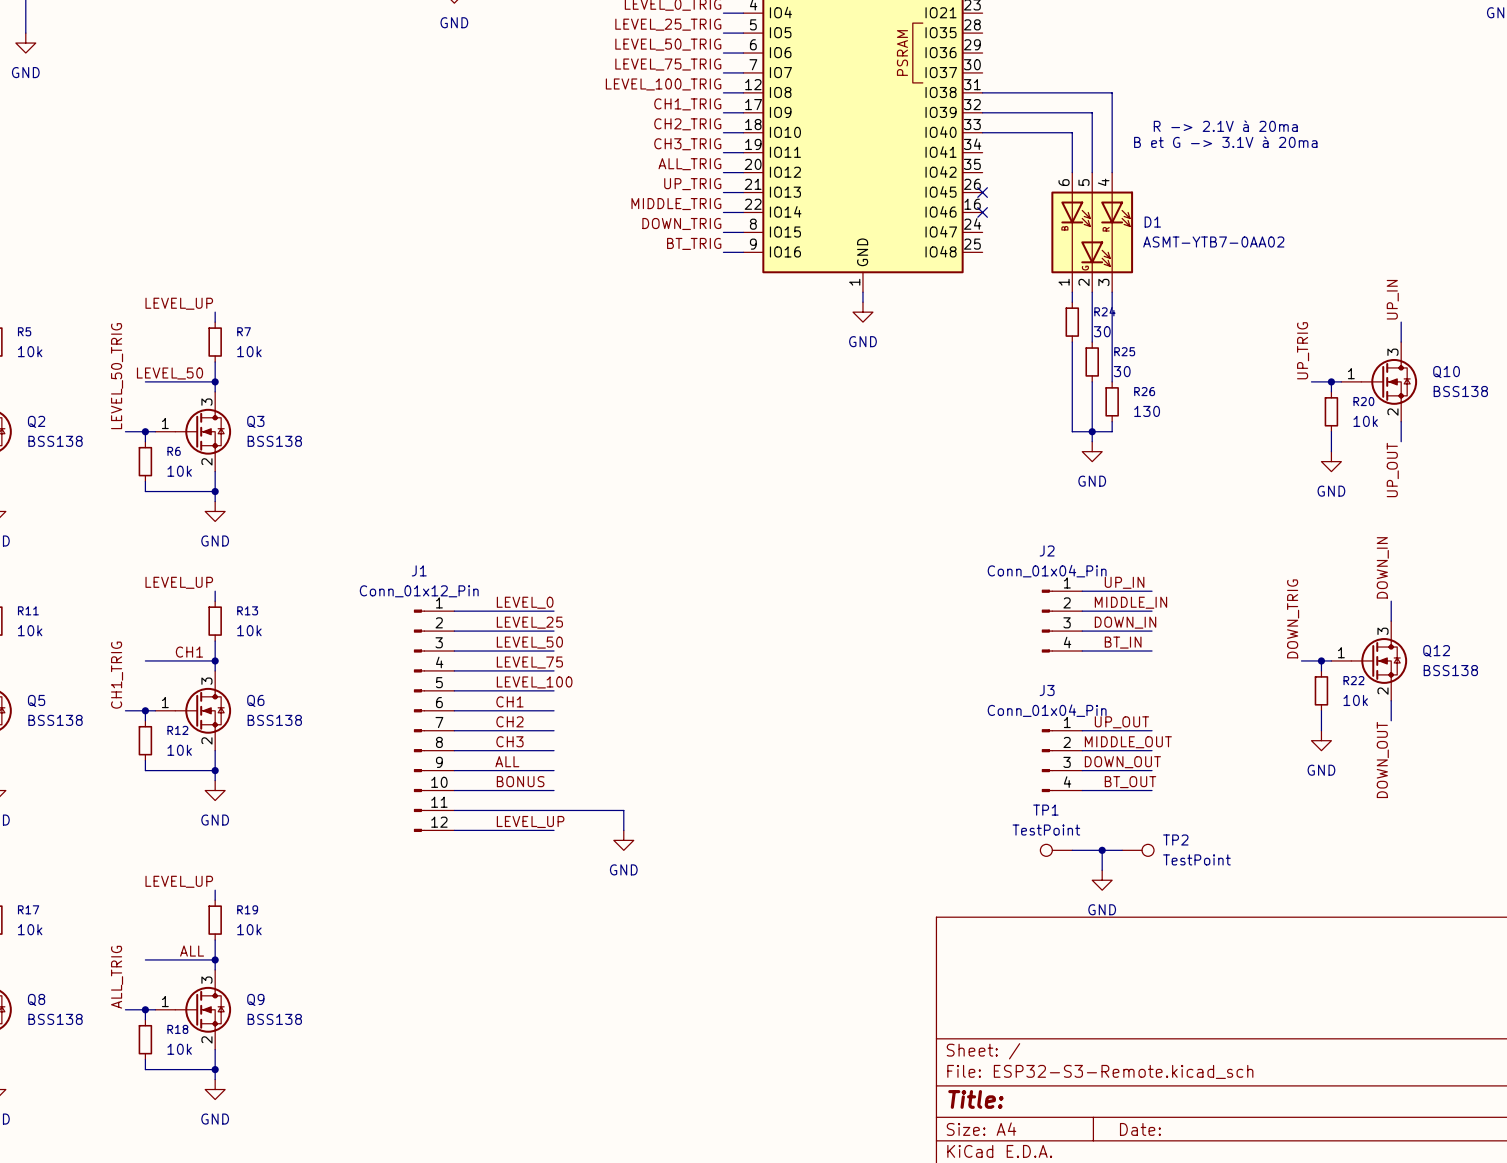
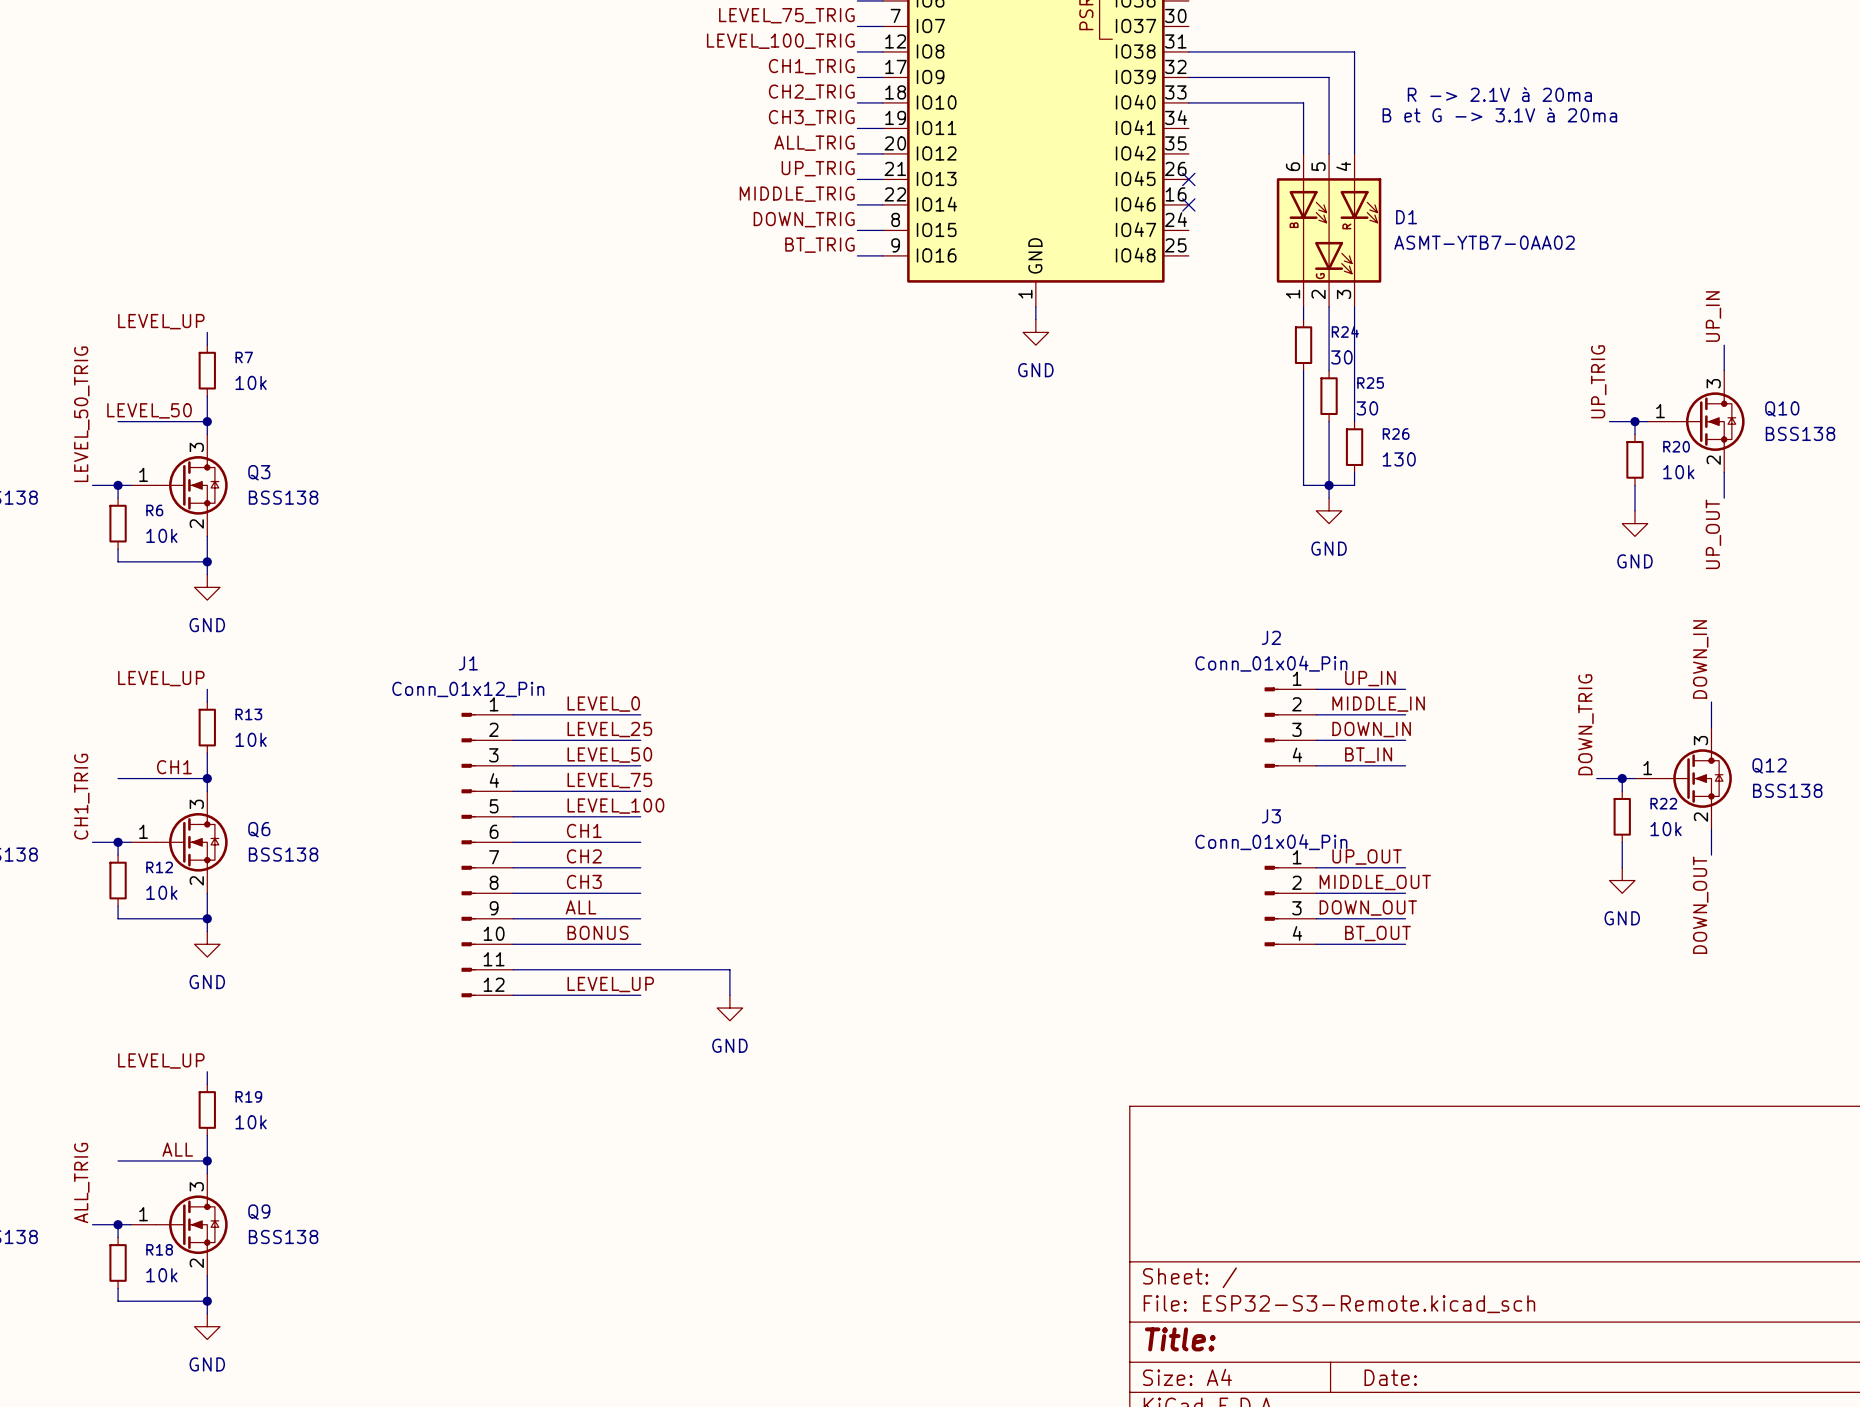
TP1: TestPoint (1056, 850) -> none
wire: (1072, 850) (1122, 850) -> none
wire: (1102, 850) (1102, 870) -> none
junction: (1102, 850) -> none
TP2: TestPoint (1138, 850) -> none
power symbol: GND (1102, 880) -> none

